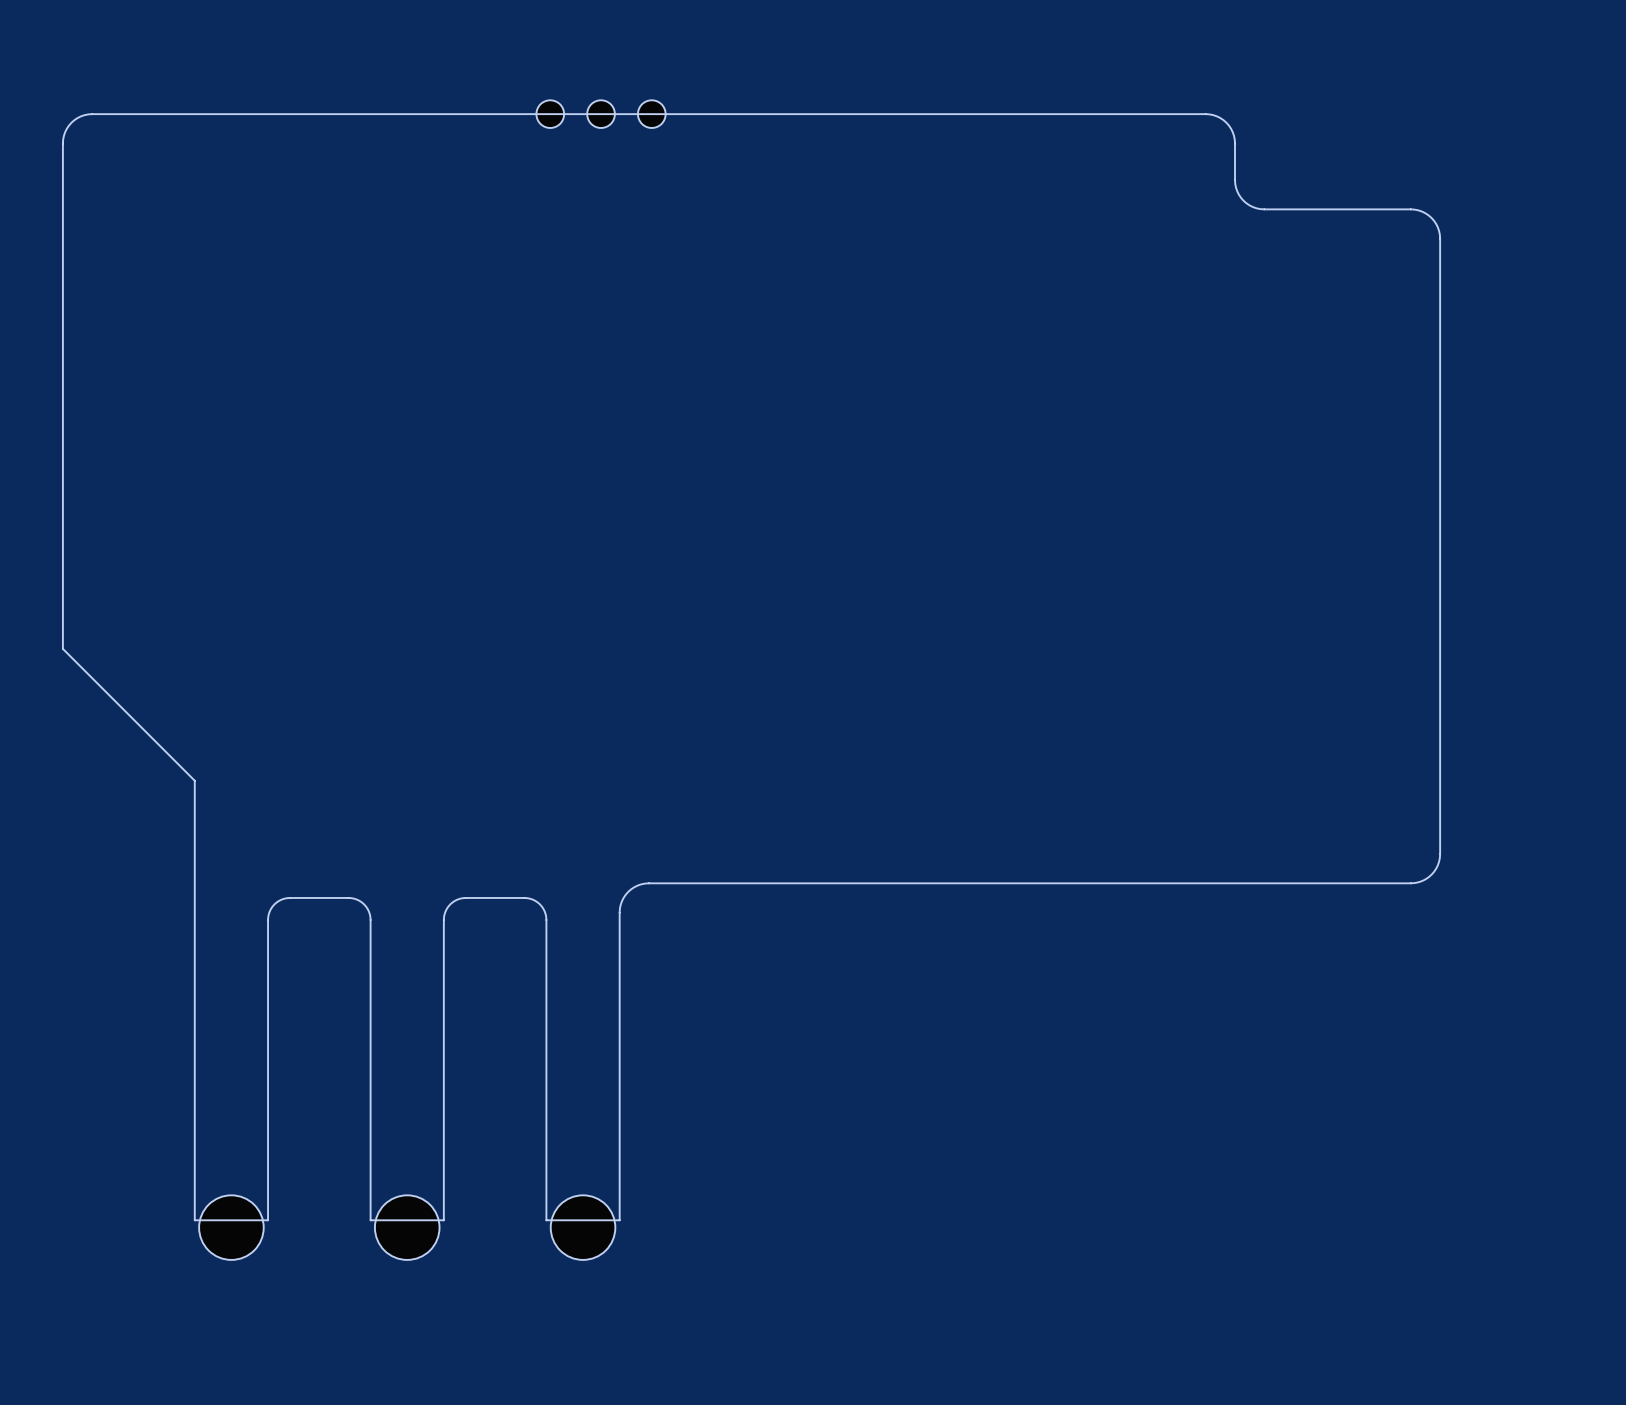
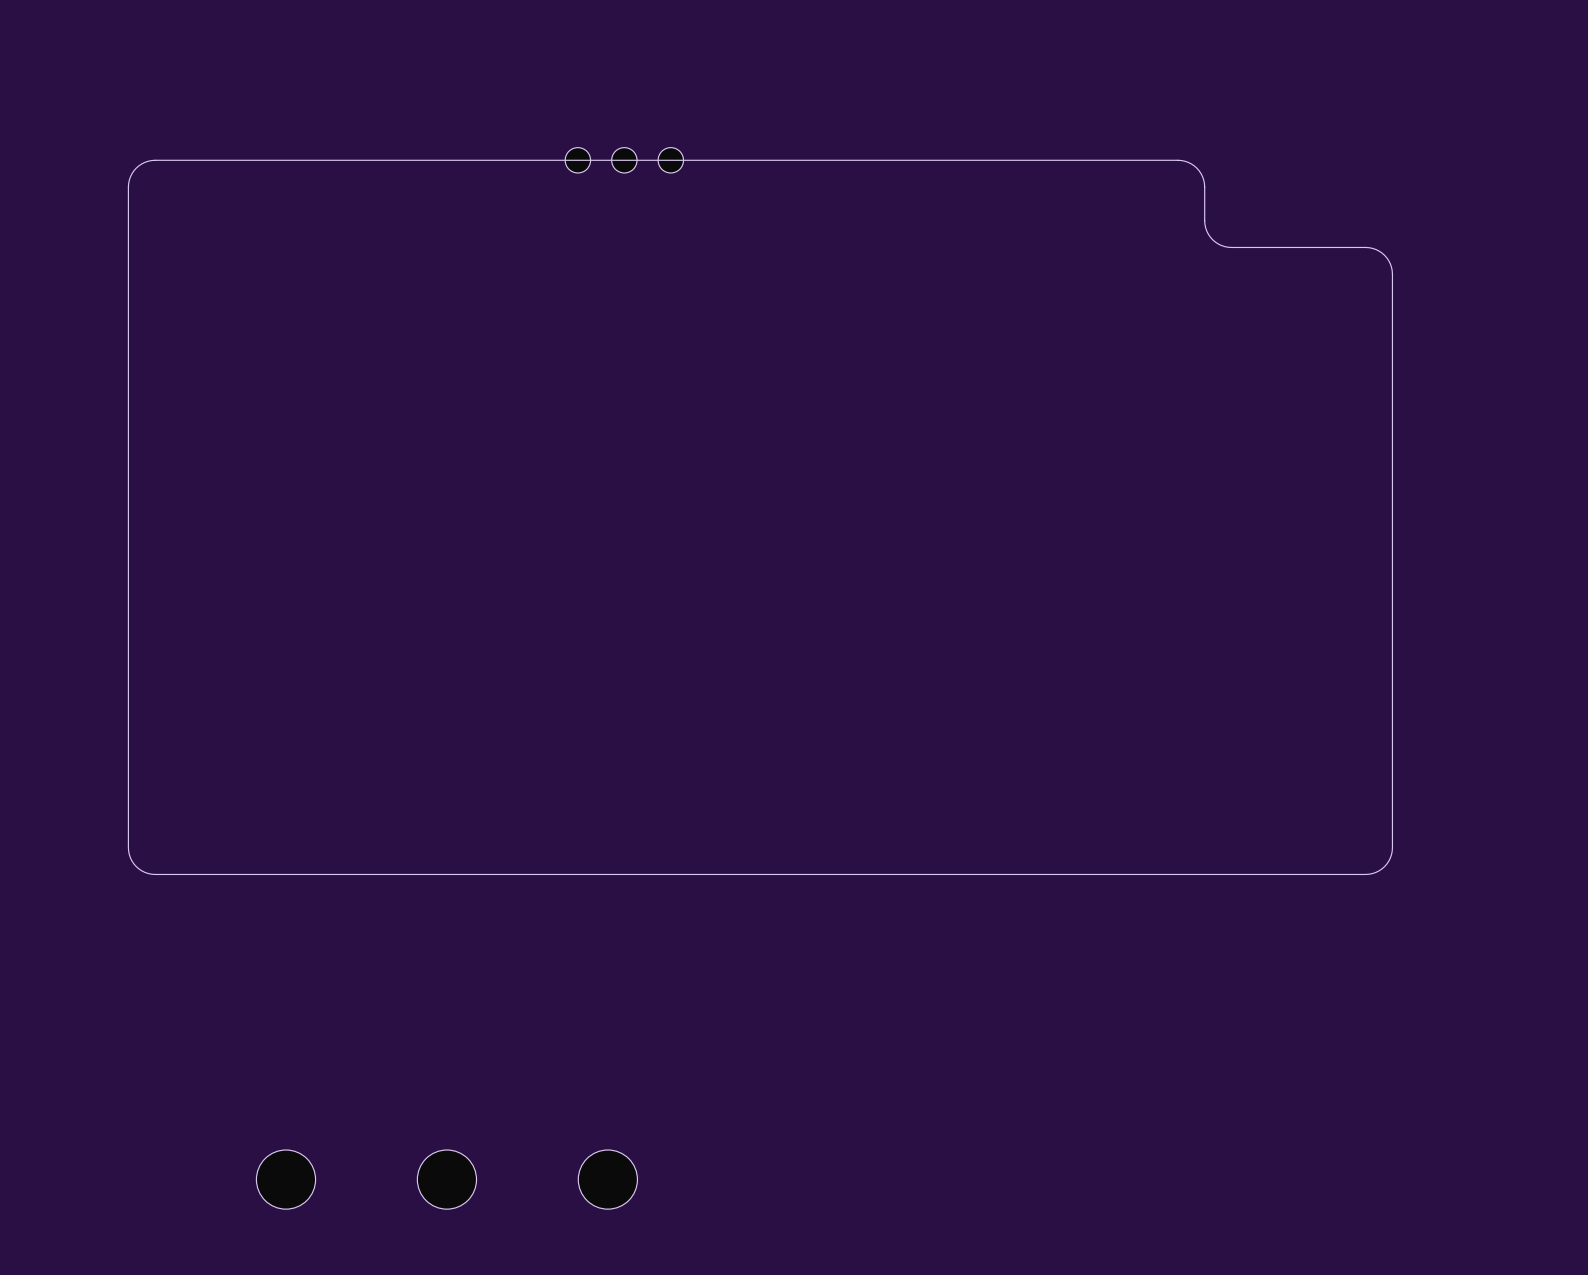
board edge: (92, 114) (81, 116) (71, 122) (65, 132) (62, 143) (62, 648) (194, 780) (194, 1220) (268, 1220) (268, 919) (272, 906) (284, 898) (351, 898) (364, 904) (369, 914) (370, 1220) (443, 1220) (443, 919) (446, 908) (454, 900) (465, 897) (527, 898) (539, 904) (544, 911) (546, 919) (546, 1220) (619, 1220) (619, 912) (625, 894) (637, 885) (648, 883) (1410, 883) (1422, 881) (1431, 874) (1437, 865) (1440, 854) -> (158, 160) (144, 162) (136, 168) (130, 176) (128, 187) (128, 847) (132, 861) (141, 870) (155, 874) (1365, 874) (1379, 870) (1386, 863) (1391, 854) (1392, 837)

